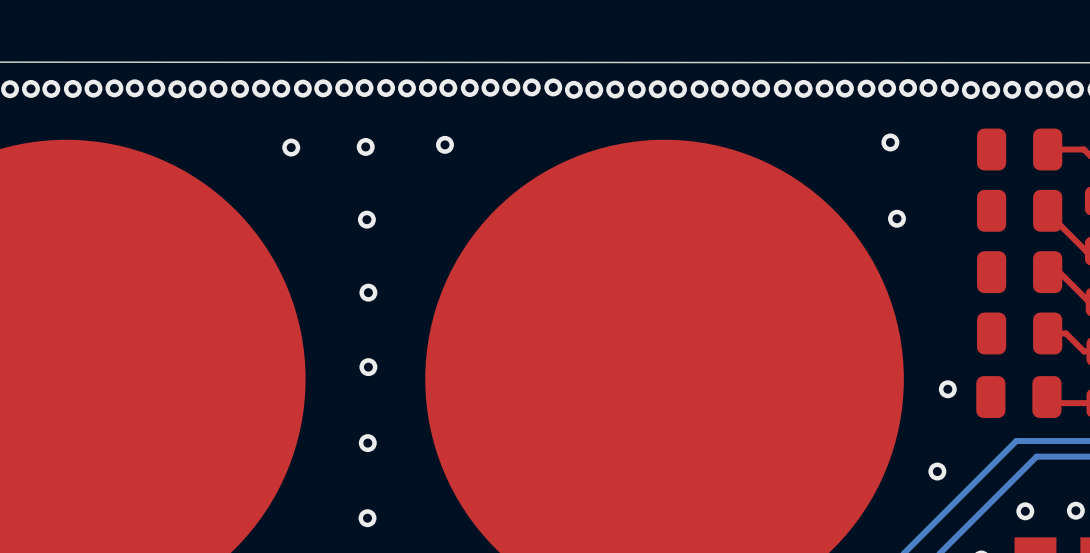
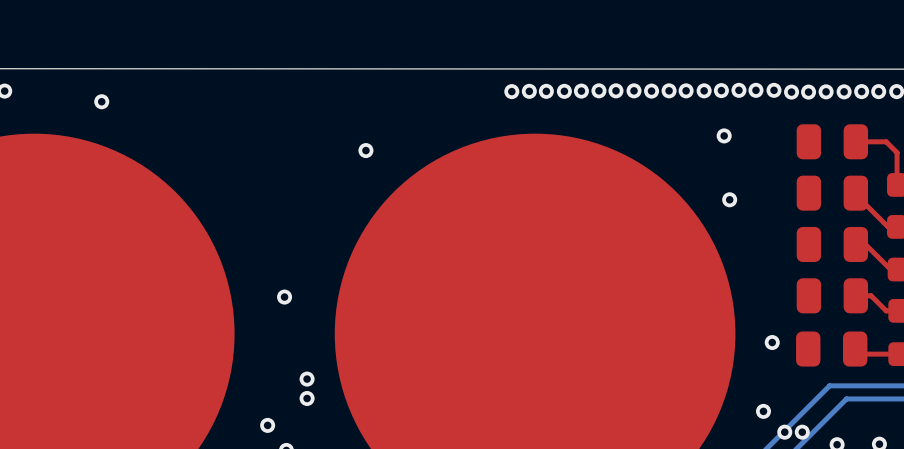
via: (490, 87) -> none
via: (511, 87) -> none
via: (531, 87) -> none
via: (553, 87) -> none
via: (51, 88) -> none
via: (72, 88) -> none
via: (93, 88) -> none
via: (114, 88) -> none
via: (134, 88) -> none
via: (156, 88) -> none
via: (218, 88) -> none
via: (240, 88) -> none
via: (261, 88) -> none
via: (281, 88) -> none
via: (302, 88) -> none
via: (323, 88) -> none
via: (344, 88) -> none
via: (364, 88) -> none
via: (386, 88) -> none
via: (406, 88) -> none
via: (427, 88) -> none
via: (448, 88) -> none
via: (469, 88) -> none
via: (177, 89) -> none
via: (197, 89) -> none
via: (573, 89) -> none
via: (594, 89) -> none
via: (615, 89) -> none
via: none -> (101, 101)
via position: (444, 144) -> (365, 150)
via: (365, 146) -> none
via: (291, 147) -> none
via: (366, 219) -> none
via: (368, 292) -> none
via: none -> (284, 297)
via: (368, 367) -> none
via: none -> (307, 379)
via: (367, 443) -> none
via: none -> (307, 398)
via: none -> (267, 425)
via: none -> (784, 432)
via: none -> (802, 432)

